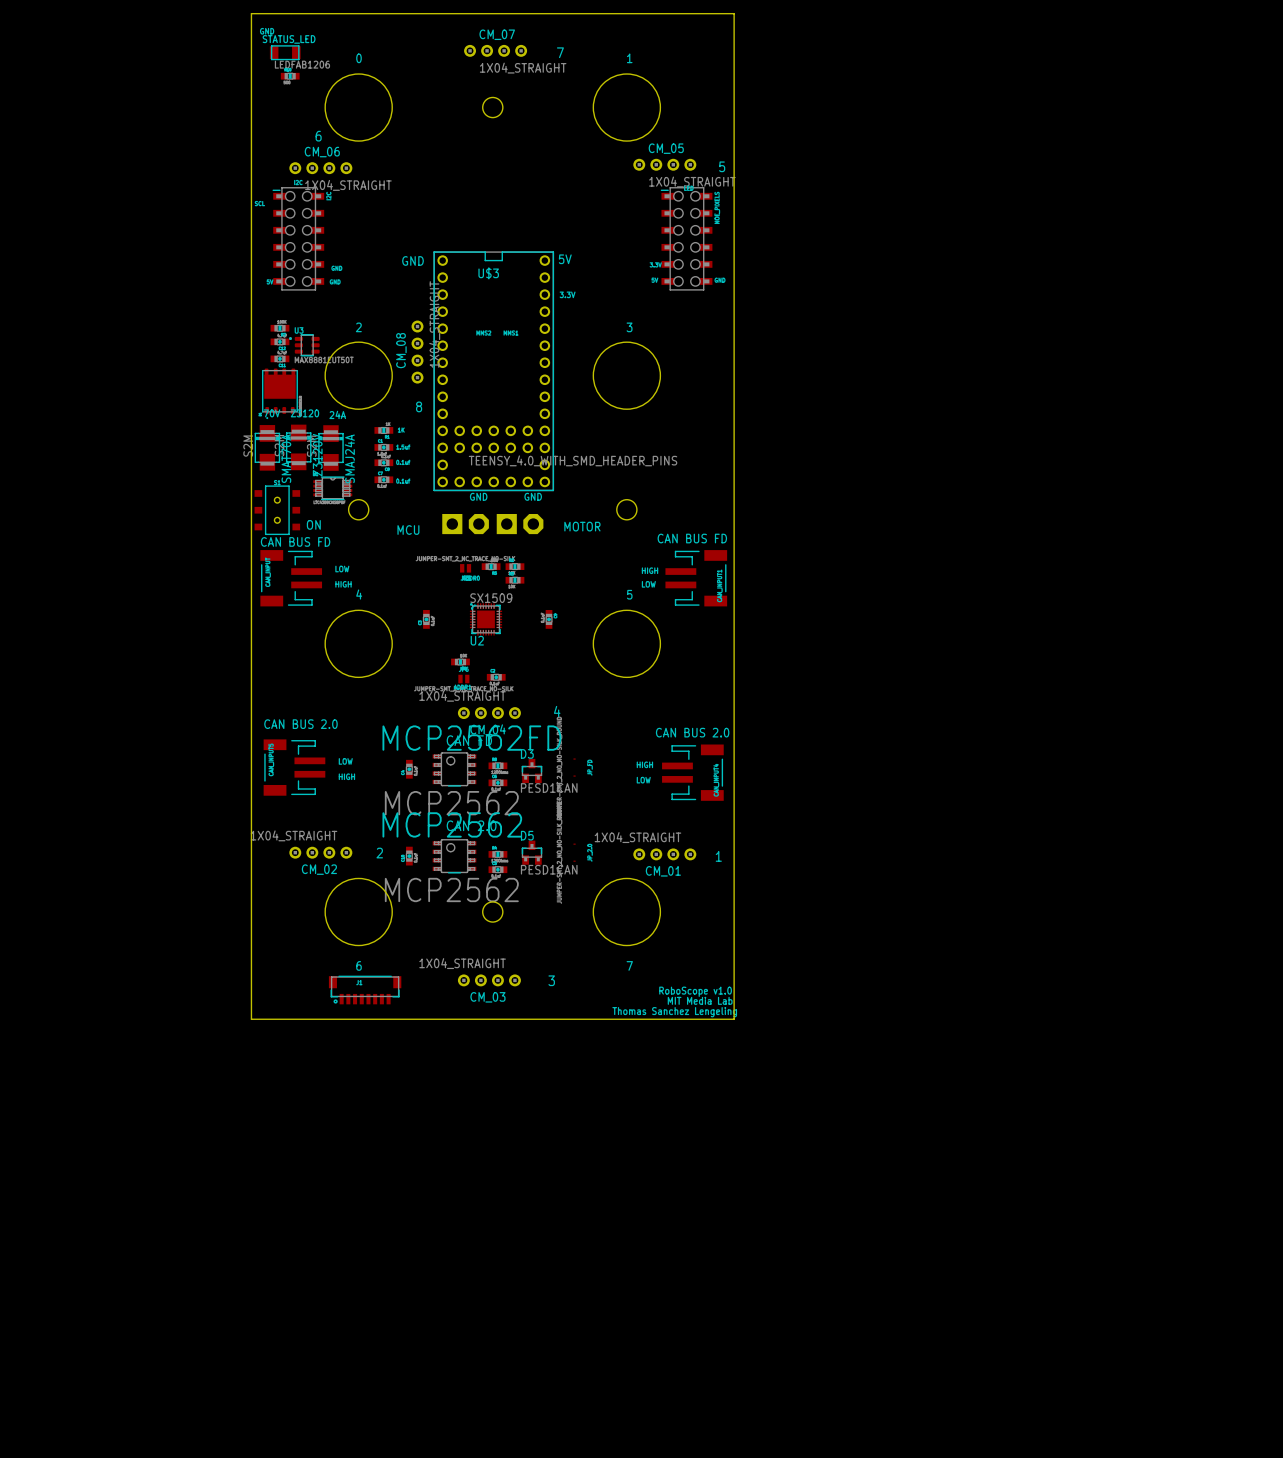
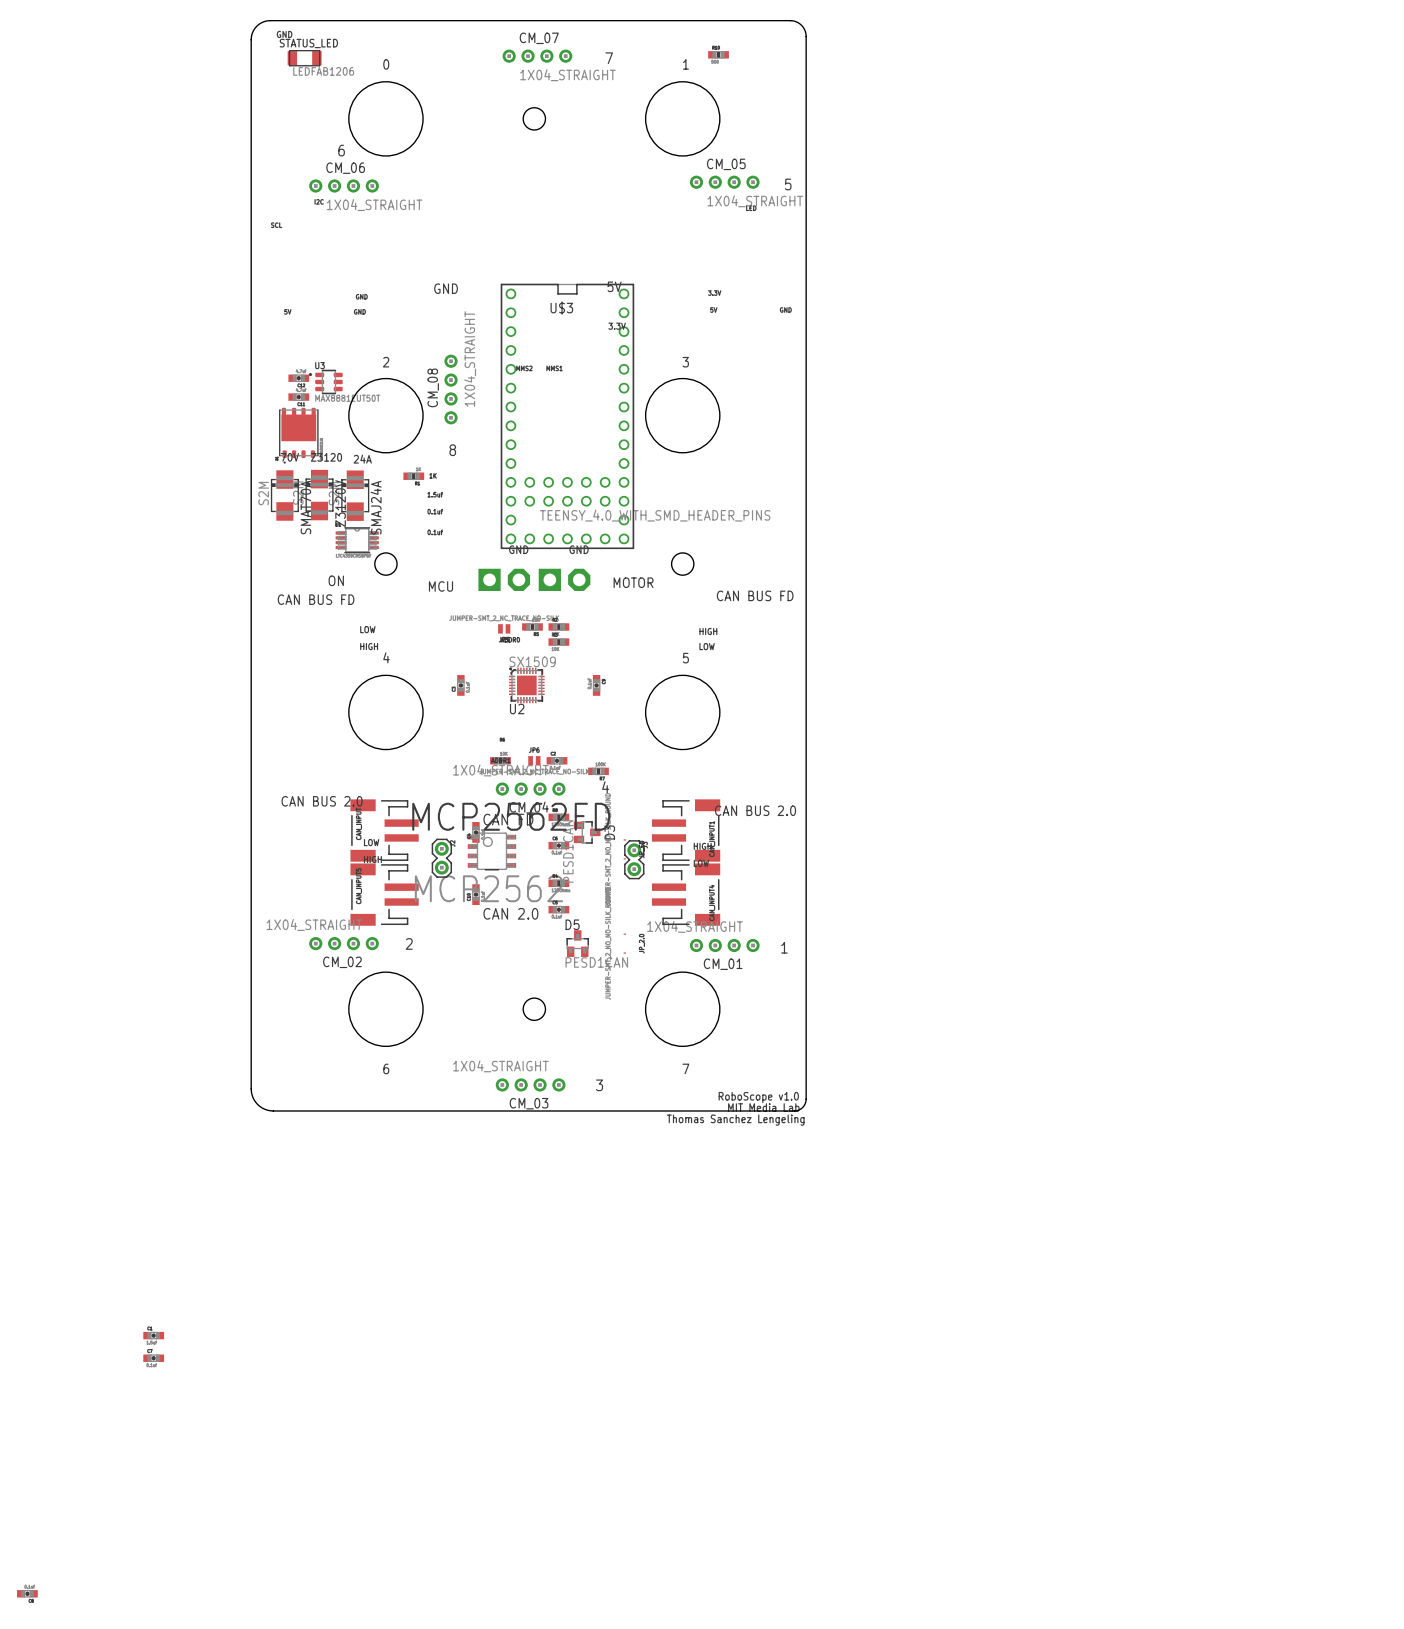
board edge: (251, 13) (251, 1019) (734, 1019) (734, 13) (251, 13) -> (270, 20) (256, 26) (251, 39) (251, 1088) (252, 1097) (259, 1106) (273, 1110) (798, 1110) (803, 1106) (806, 1099) (804, 30) (799, 23) (790, 20) (270, 20)
part position: (290, 76) -> (718, 54)
part: (298, 238) -> none
part: (686, 238) -> none
U$3 footprint: [433, 251, 555, 492] -> [500, 283, 635, 550]
part position: (279, 328) -> (598, 771)
part position: (383, 447) -> (153, 1335)
part position: (383, 462) -> (27, 1593)
part position: (383, 479) -> (153, 1358)
part: (277, 510) -> none
part: (291, 578) -> none
part position: (696, 578) -> (686, 830)
part position: (460, 661) -> (500, 760)
part position: (496, 677) -> (557, 760)
part position: (463, 679) -> (534, 760)
part: none -> (384, 830)
part position: (497, 765) -> (558, 817)
part position: (294, 767) -> (384, 894)
part position: (409, 769) -> (475, 832)
D3 rotation: 0° (531, 770) -> 90° clockwise (587, 832)
D3 position: (531, 770) -> (587, 832)
part position: (692, 772) -> (686, 894)
part: none -> (441, 858)
part: none -> (634, 859)
part position: (497, 782) -> (558, 845)
part position: (497, 854) -> (558, 883)
part position: (409, 856) -> (475, 894)
MCP2562: MCP2562 (454, 856) -> none
part position: (497, 869) -> (558, 909)
part: (365, 989) -> none

